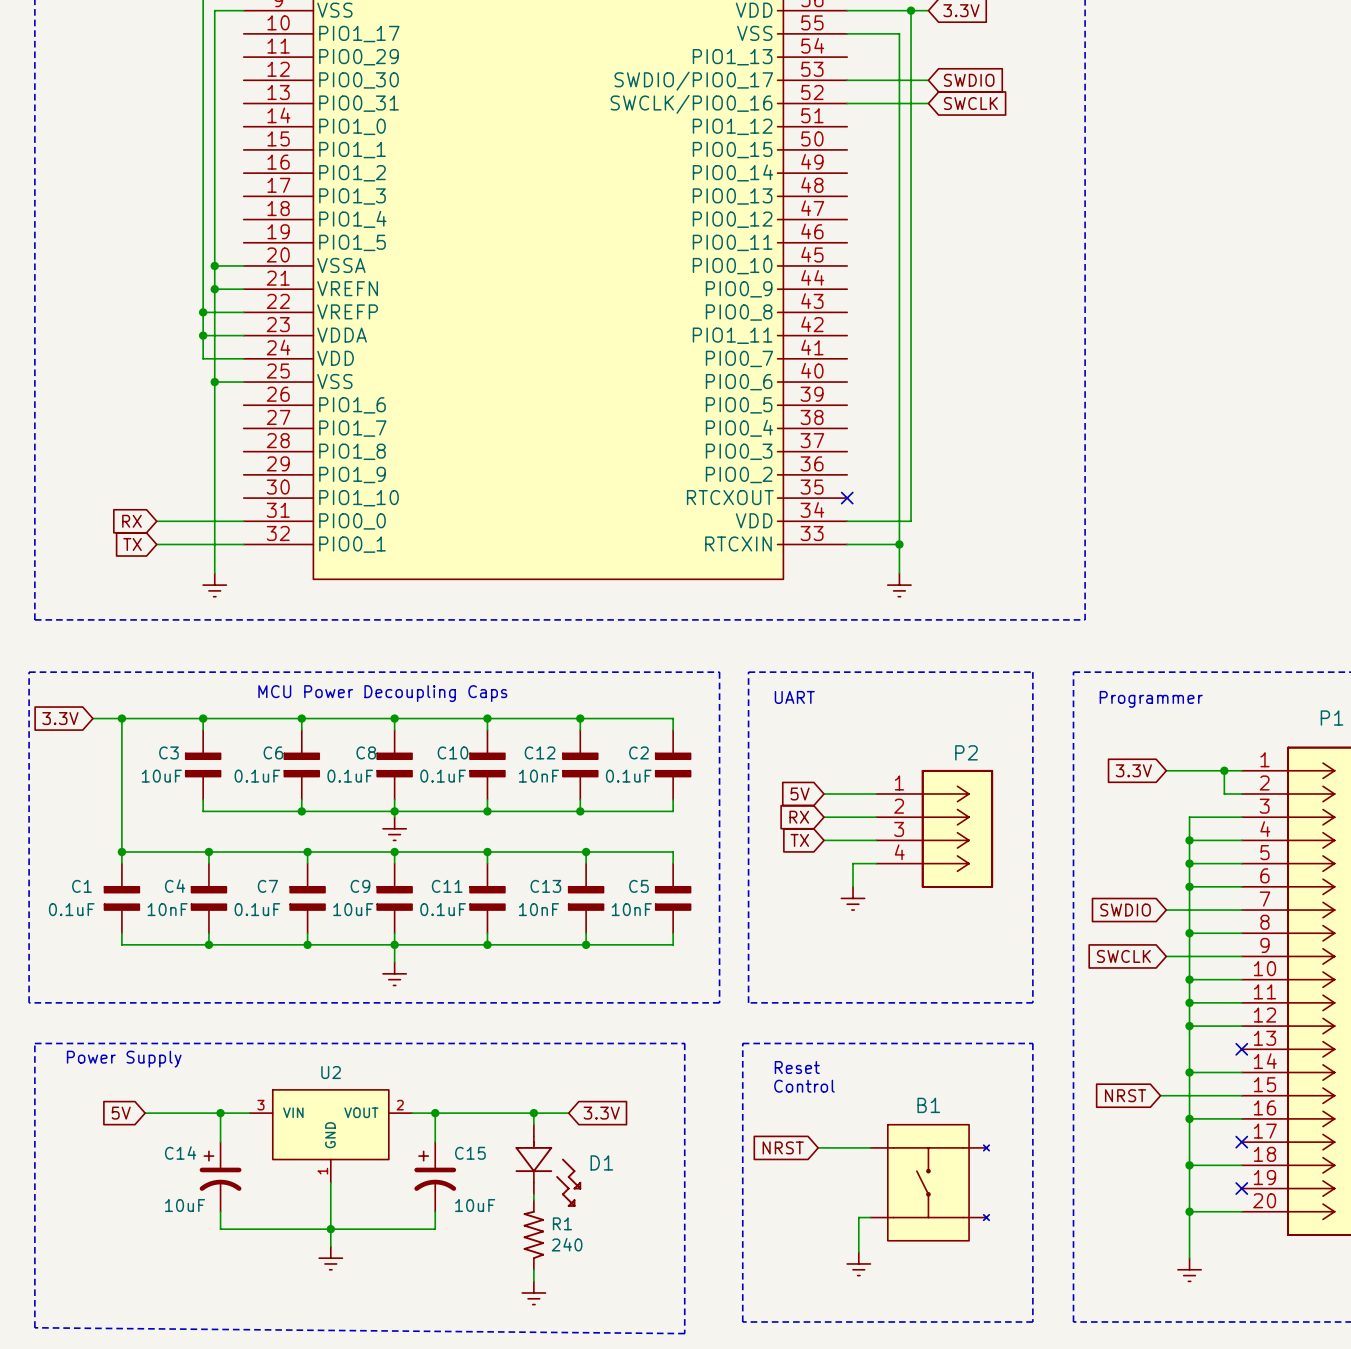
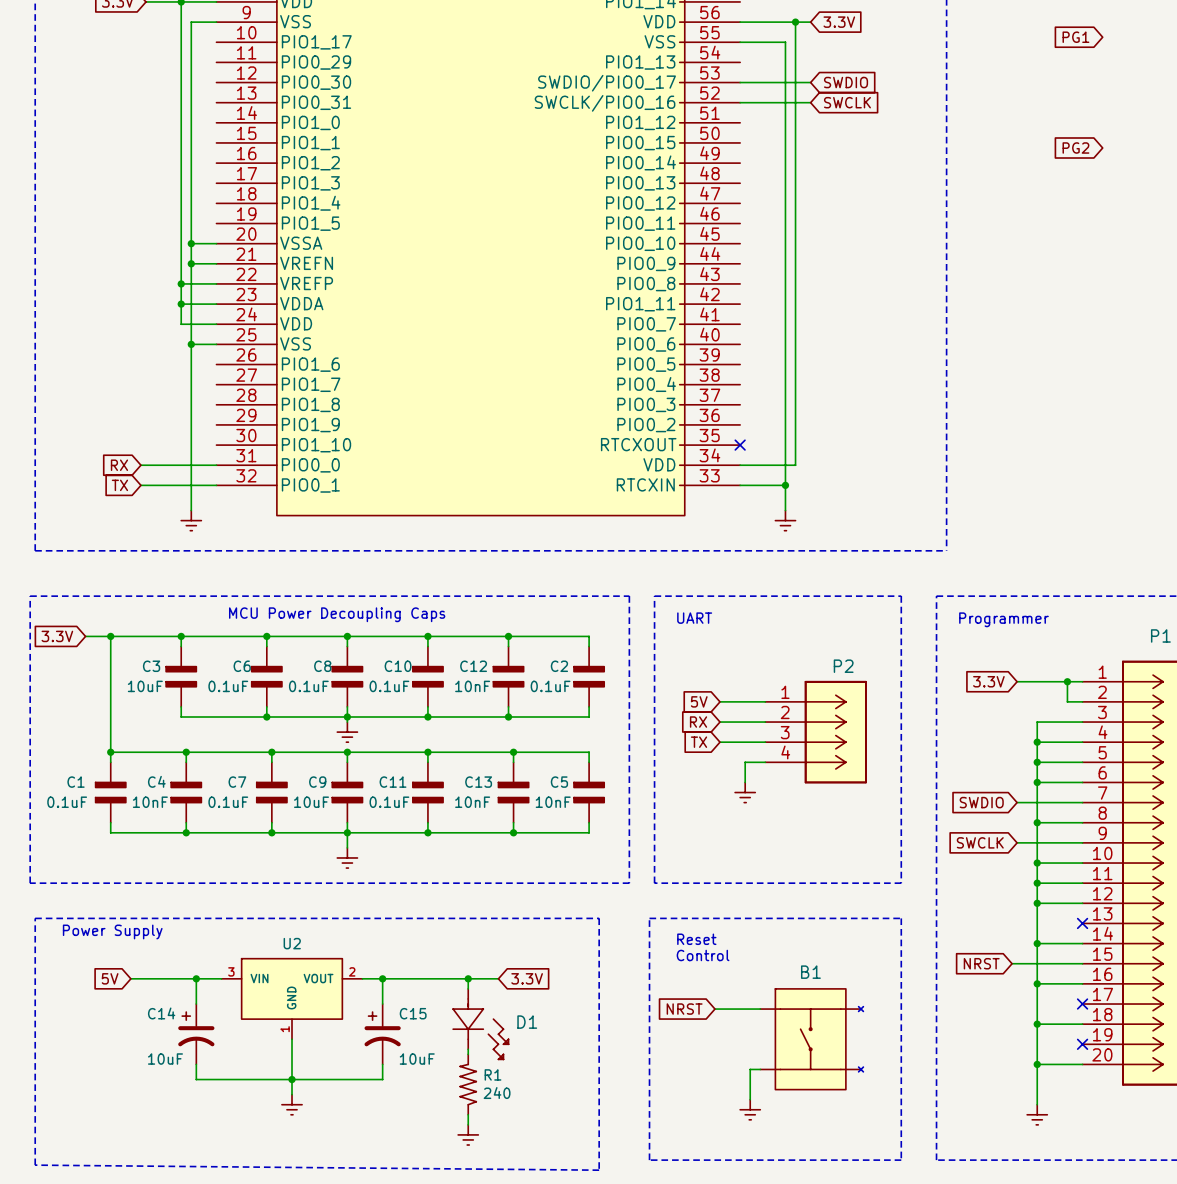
global label: none -> PG1 (1075, 37)
global label: none -> PG2 (1075, 148)

